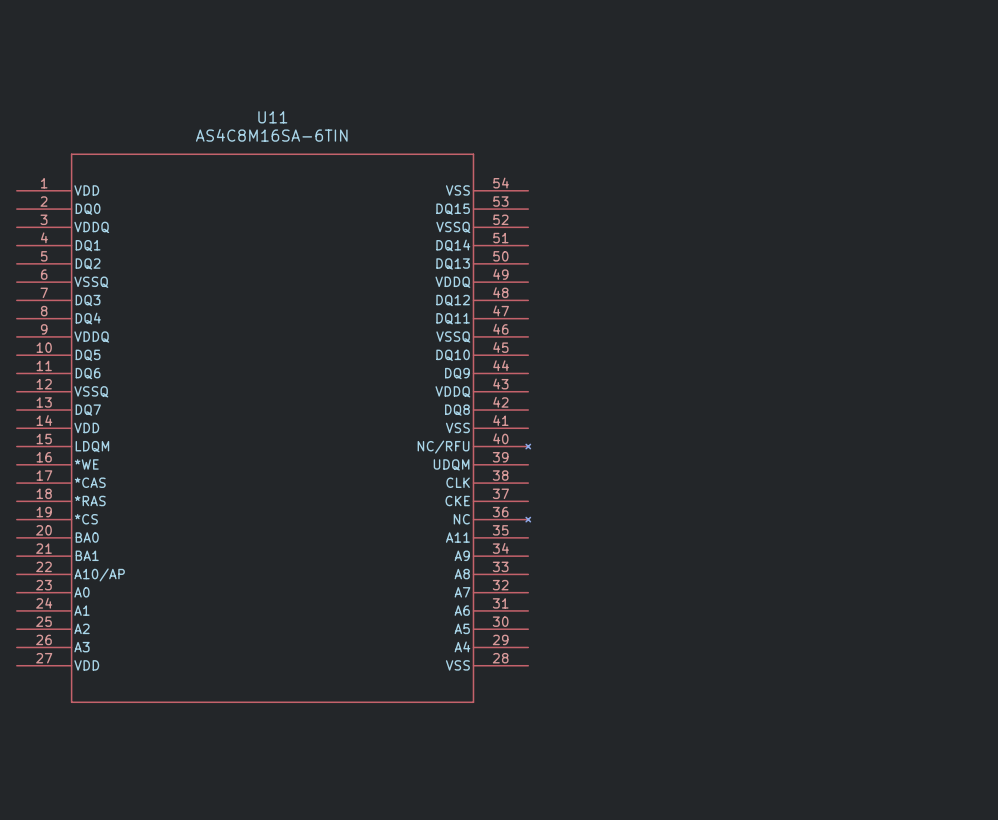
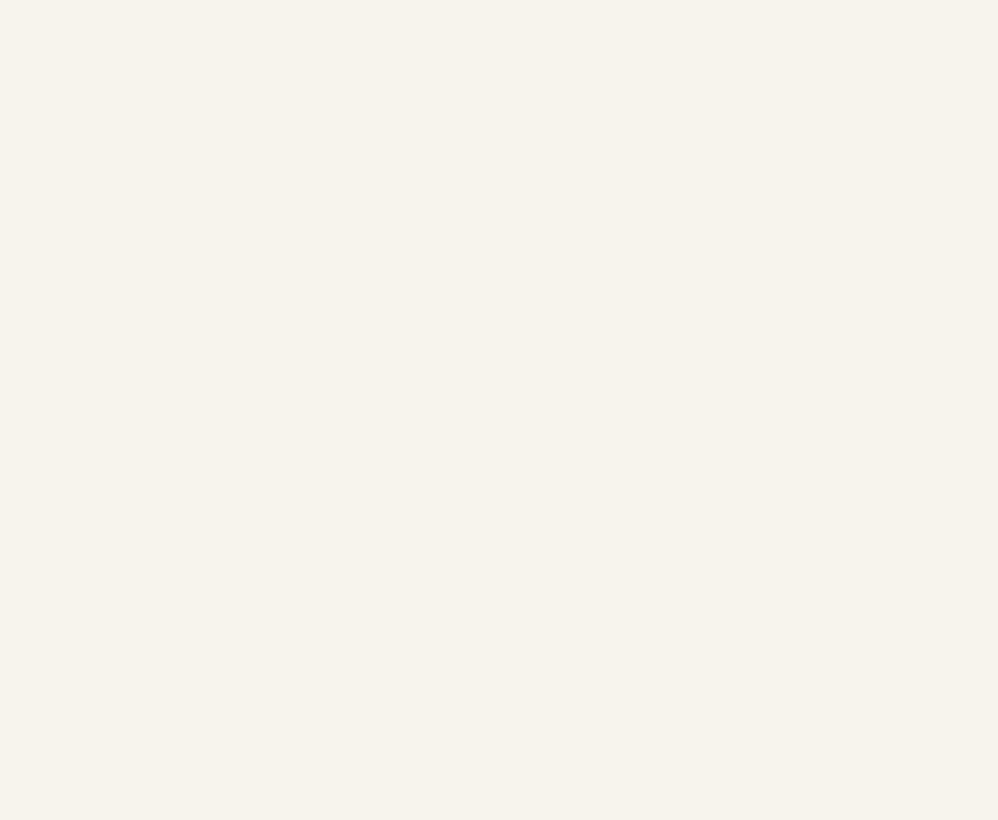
U11: AS4C8M16SA-6TIN (273, 428) -> none

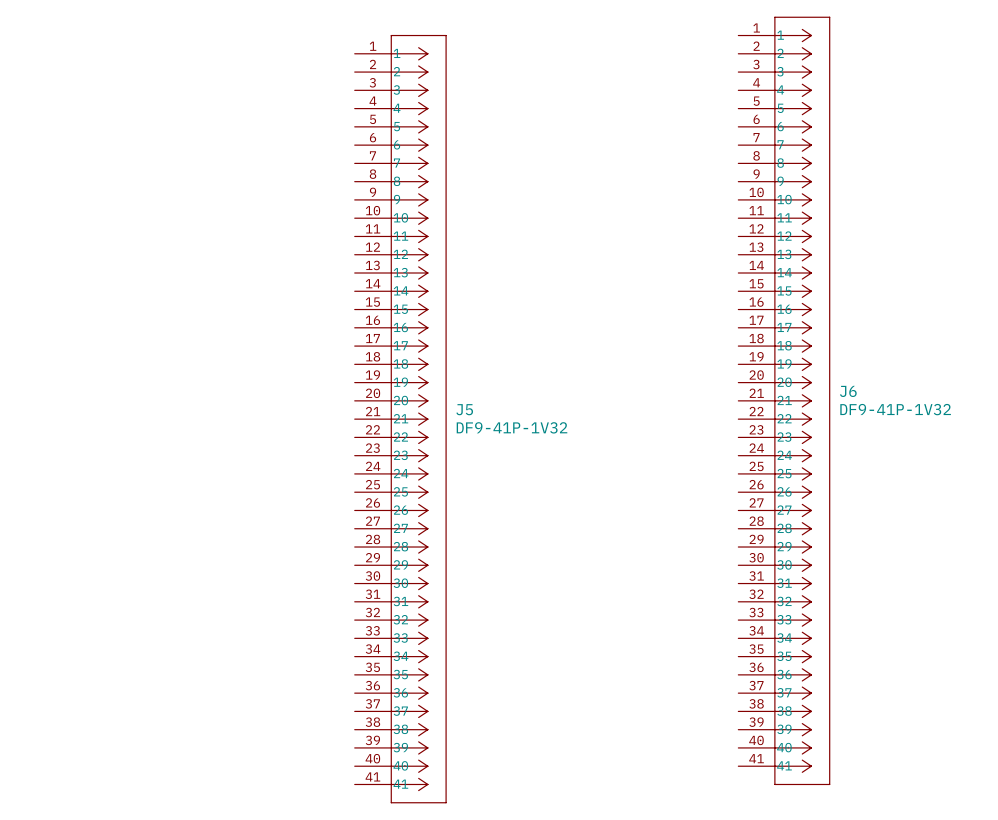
J6: none -> DF9-41P-1V32 (784, 400)
J5: none -> DF9-41P-1V32 (400, 419)

